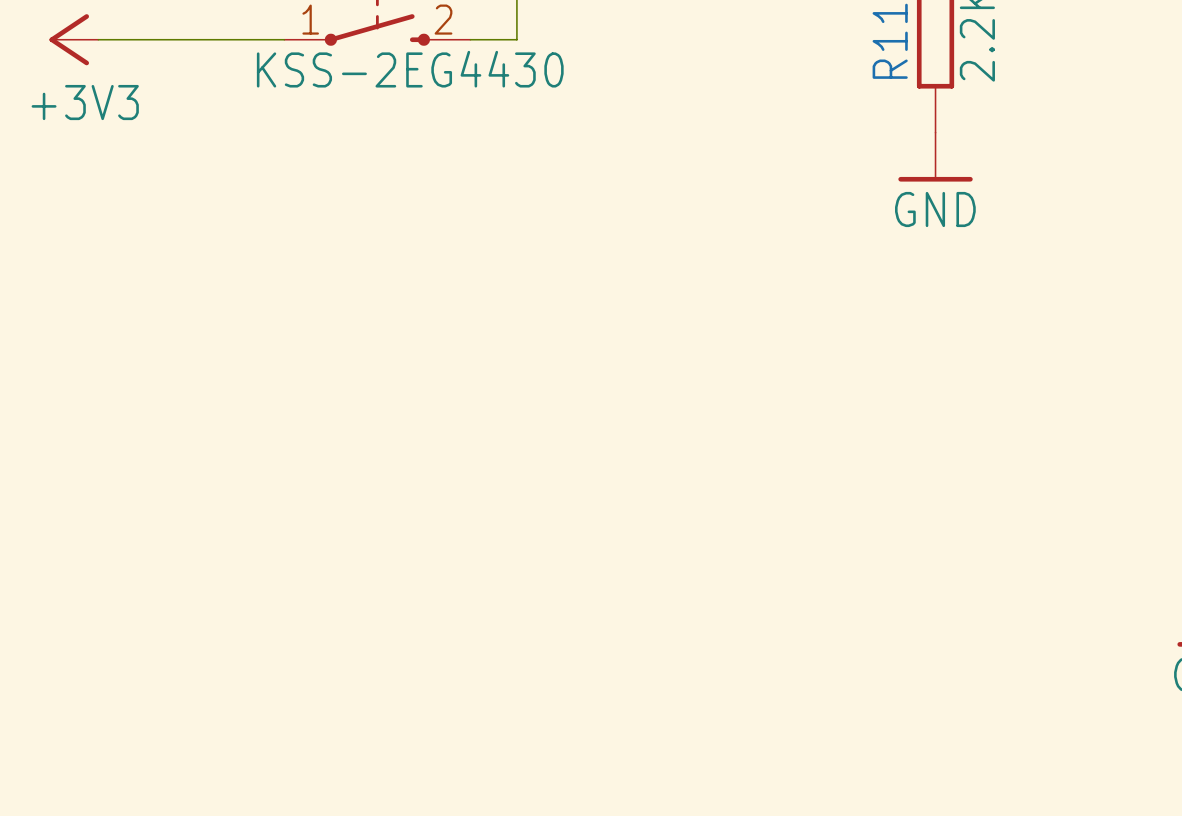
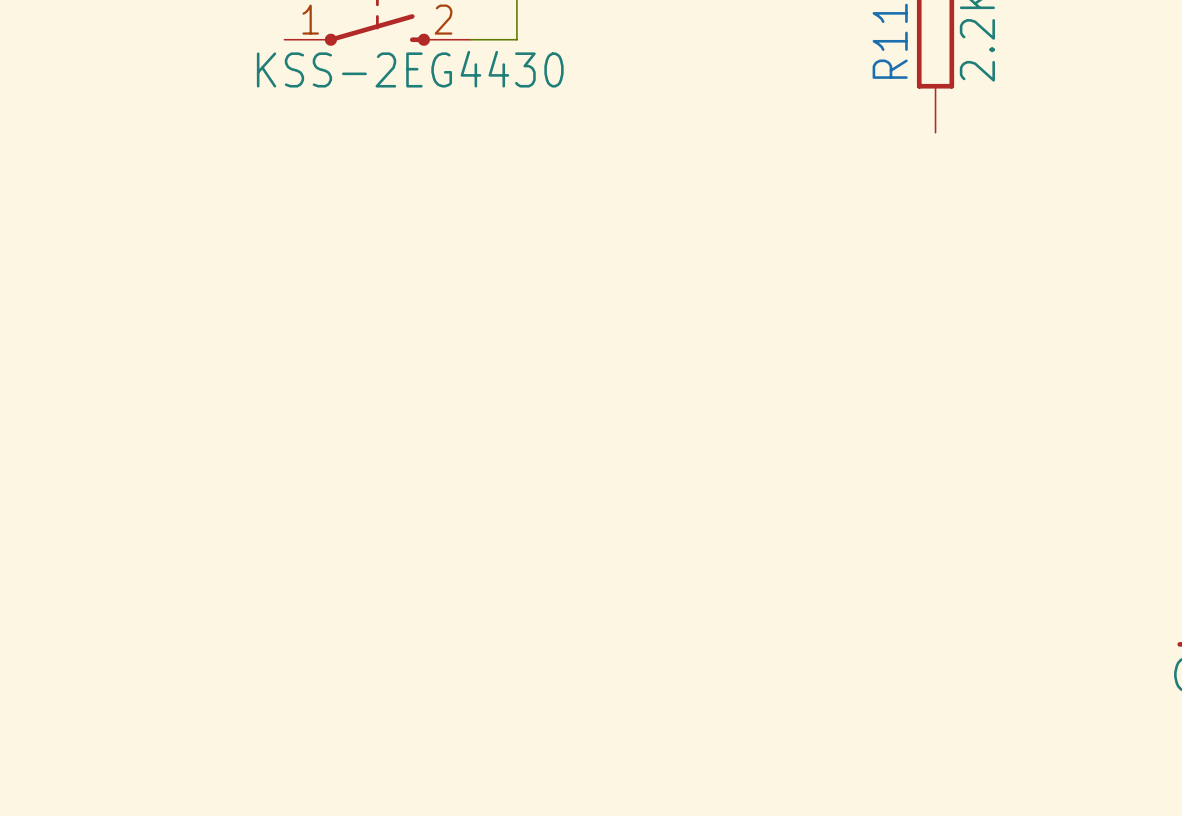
power symbol: +3V3 (73, 39) -> none
wire: (98, 39) (284, 39) -> none
power symbol: GND (935, 157) -> none

